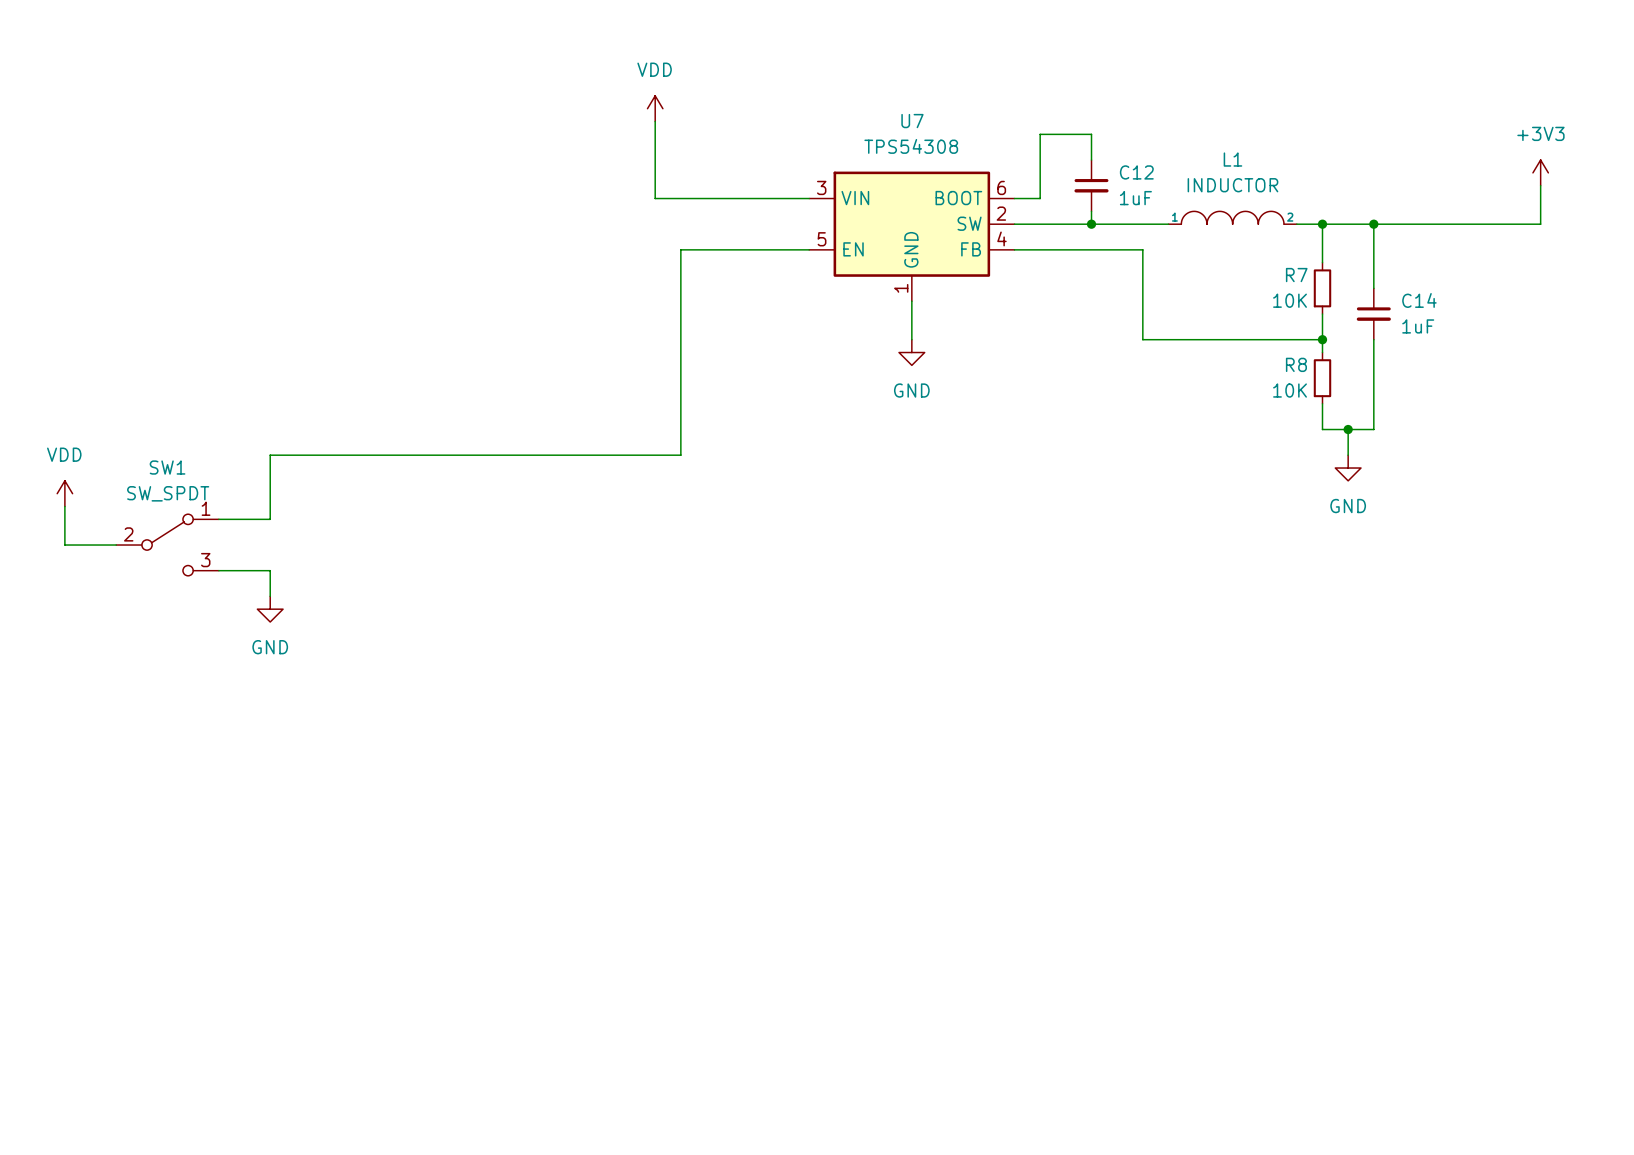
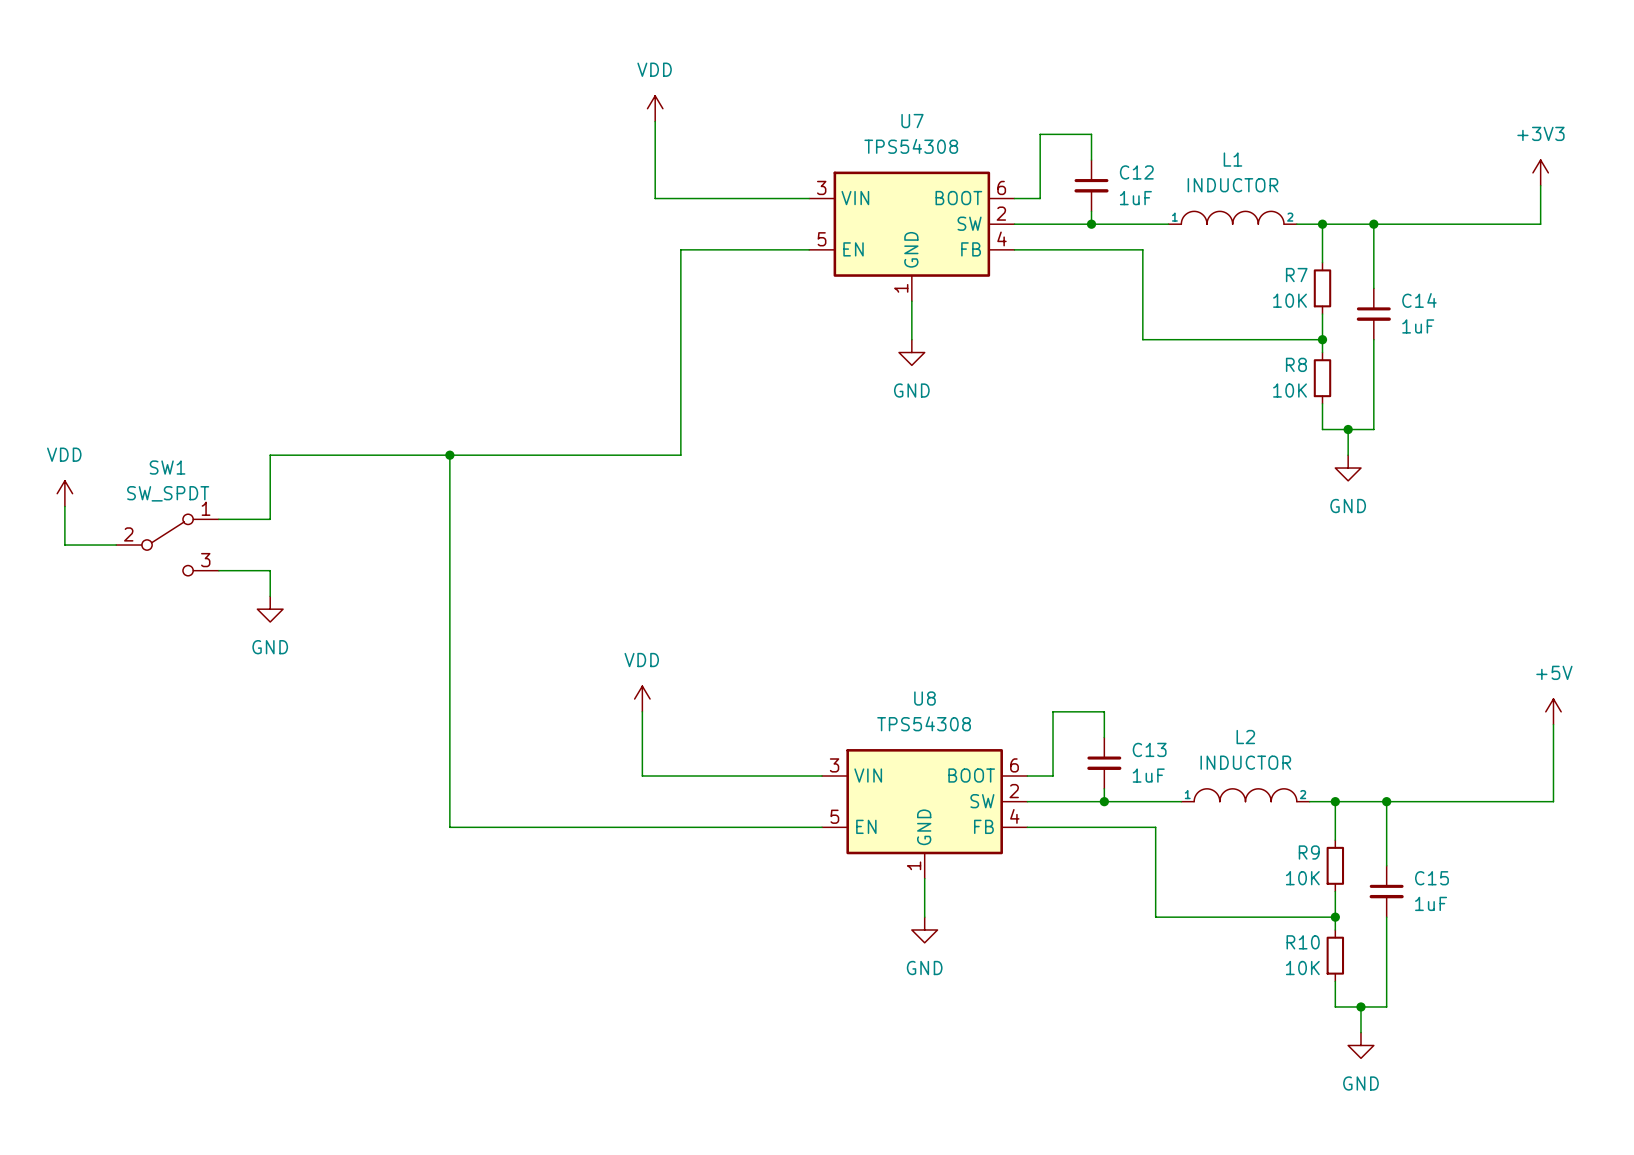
wire: none -> (449, 455) (449, 827) (822, 827)
junction: none -> (449, 455)
power symbol: none -> VDD (642, 699)
wire: none -> (642, 711) (642, 776) (822, 776)
power symbol: none -> +5V (1553, 711)
wire: none -> (1553, 724) (1553, 801) (1309, 801)
wire: none -> (1104, 737) (1104, 711) (1053, 711) (1053, 776) (1027, 776)
C13: none -> 1uF (1104, 763)
wire: none -> (1104, 788) (1104, 801)
L2: none -> INDUCTOR (1245, 795)
wire: none -> (1027, 801) (1181, 801)
junction: none -> (1104, 801)
wire: none -> (1335, 801) (1335, 840)
junction: none -> (1335, 801)
wire: none -> (1386, 801) (1386, 865)
junction: none -> (1386, 801)
U8: none -> TPS54308 (924, 813)
wire: none -> (1027, 827) (1155, 827) (1155, 917) (1335, 917)
R9: none -> 10K (1335, 865)
wire: none -> (924, 878) (924, 917)
wire: none -> (1335, 891) (1335, 929)
C15: none -> 1uF (1386, 891)
junction: none -> (1335, 917)
wire: none -> (1386, 917) (1386, 1006) (1335, 1006) (1335, 981)
power symbol: none -> GND (924, 929)
R10: none -> 10K (1335, 955)
wire: none -> (1360, 1006) (1360, 1032)
junction: none -> (1360, 1006)
power symbol: none -> GND (1360, 1045)

